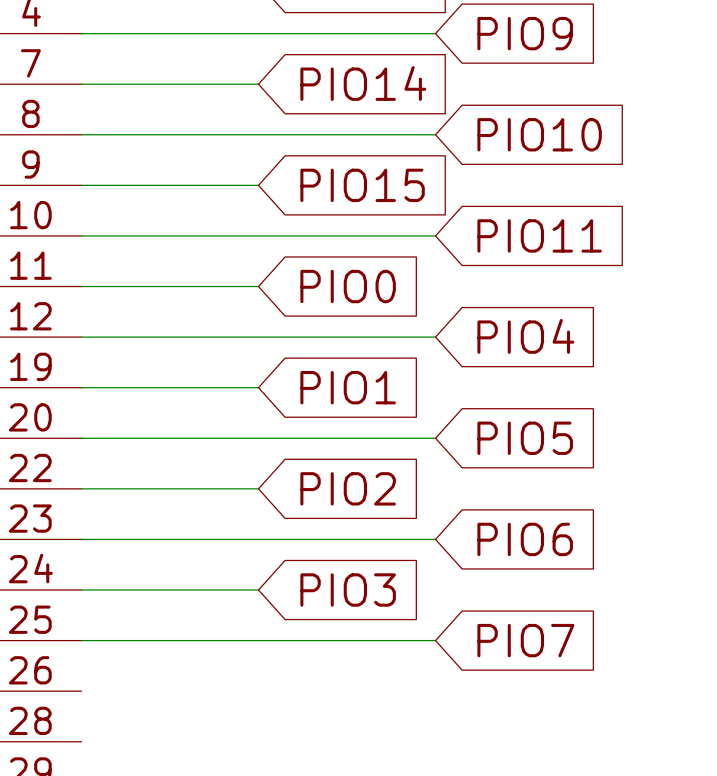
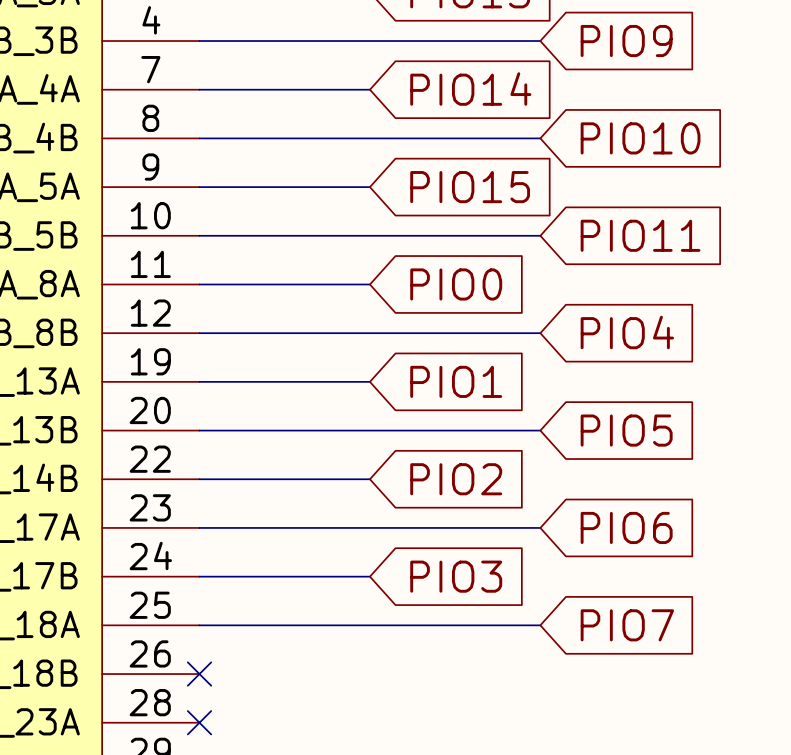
no-connect mark: none -> (199, 674)
no-connect mark: none -> (199, 722)

